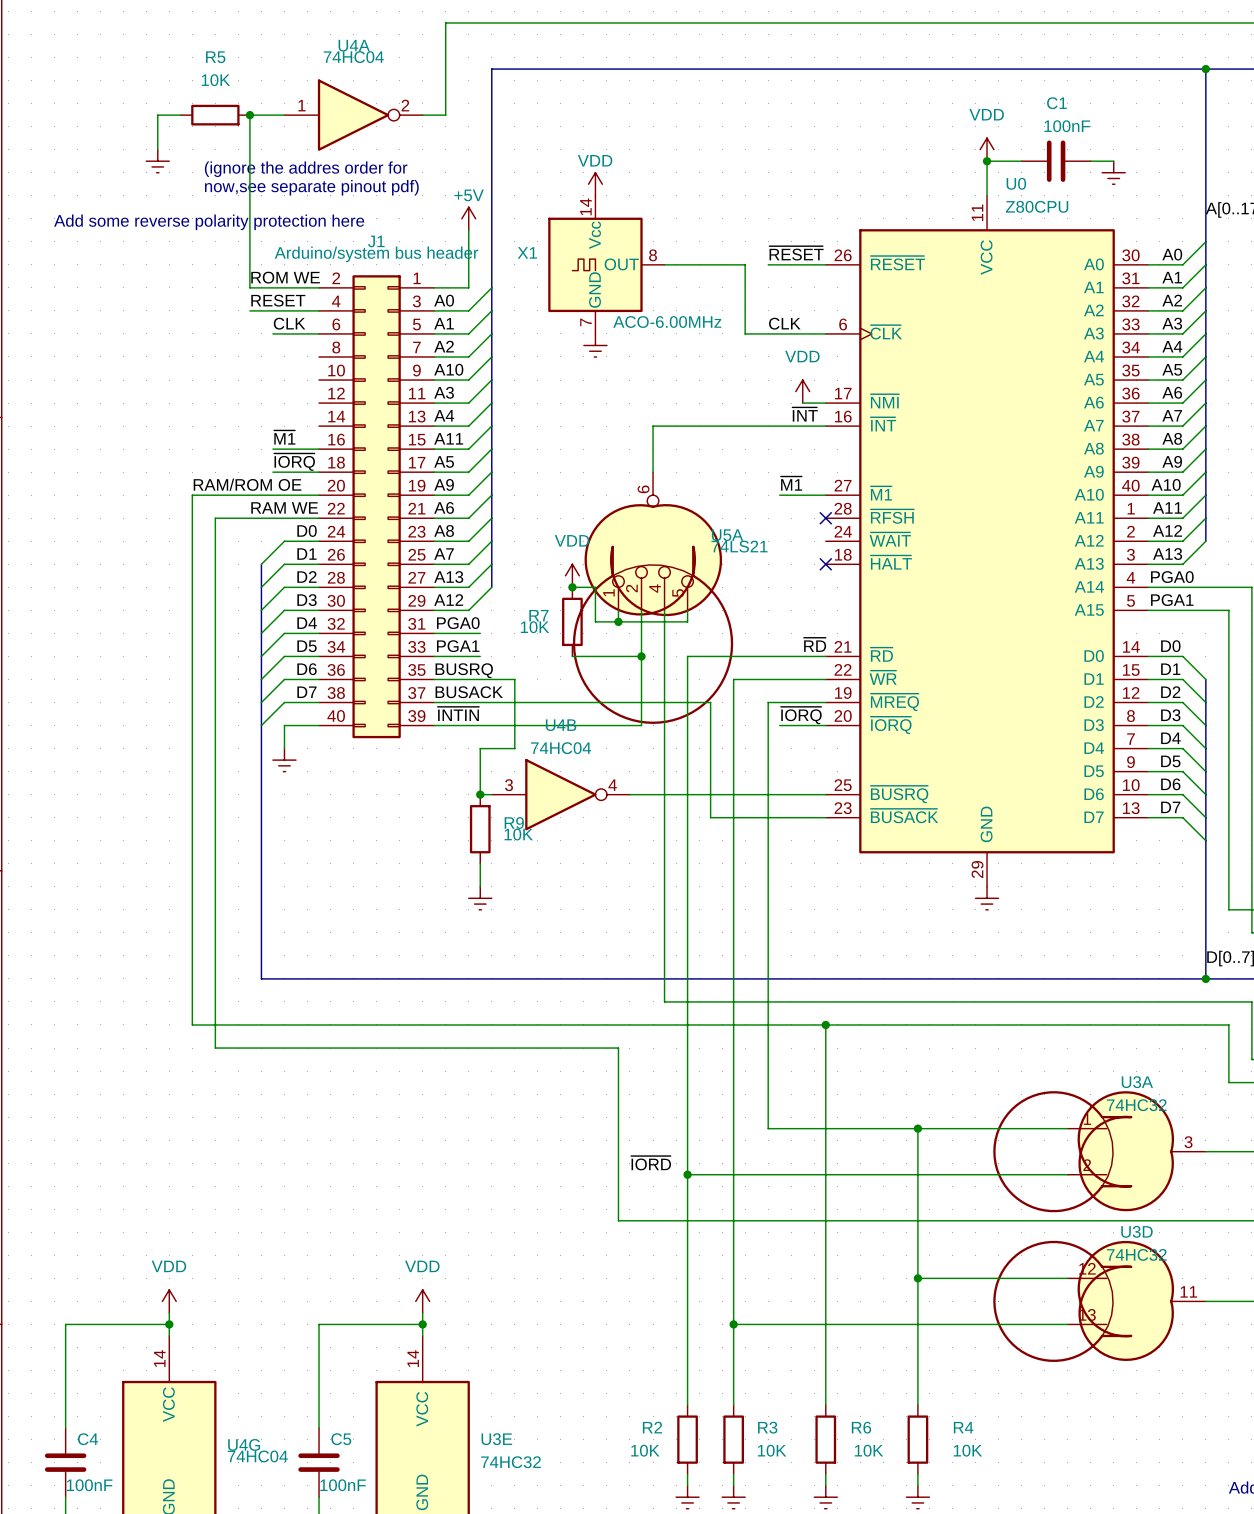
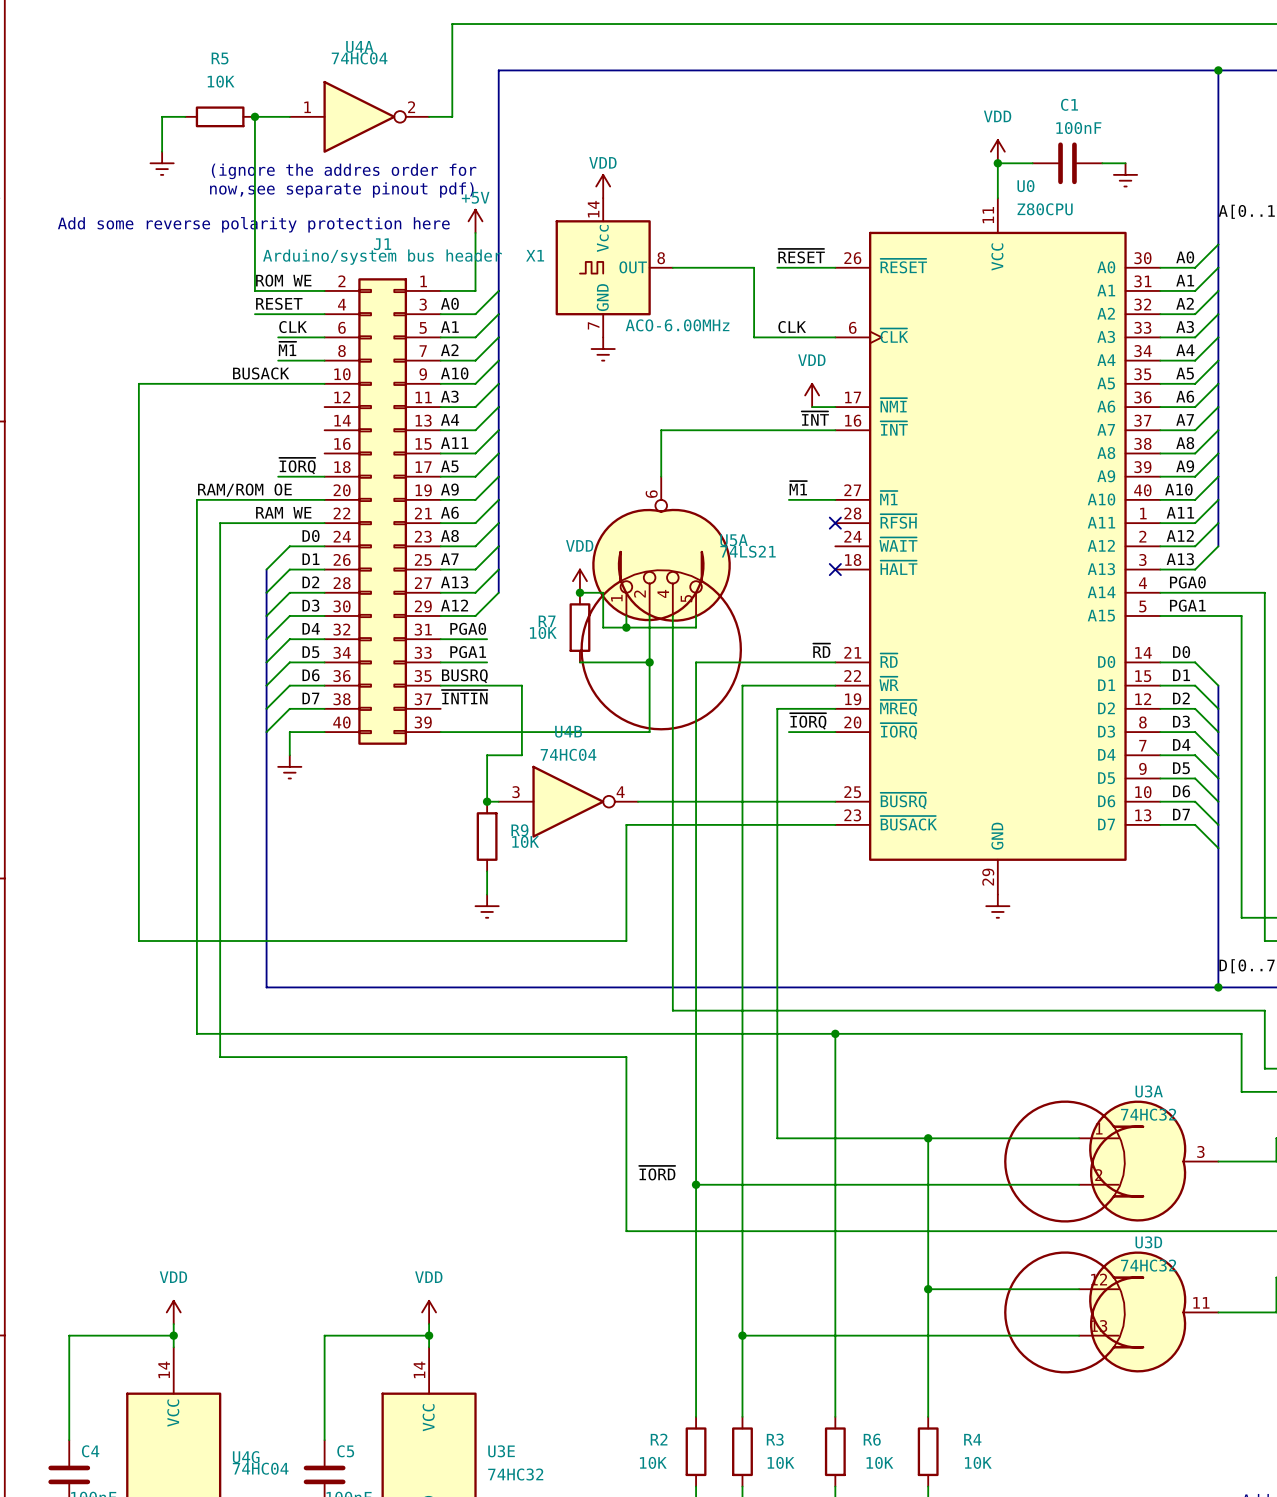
label: none -> BUSACK (261, 373)
label position: ~{M1} (284, 437) -> ~{M1} (287, 348)
wire: (272, 449) (319, 449) -> (278, 360) (324, 360)
label: BUSACK (469, 692) -> ~{INTIN} (464, 697)
wire: (434, 702) (710, 702) (710, 817) -> (324, 383) (138, 383) (138, 940) (626, 940) (626, 824) (719, 824)
label: ~{INTIN} (458, 713) -> none

